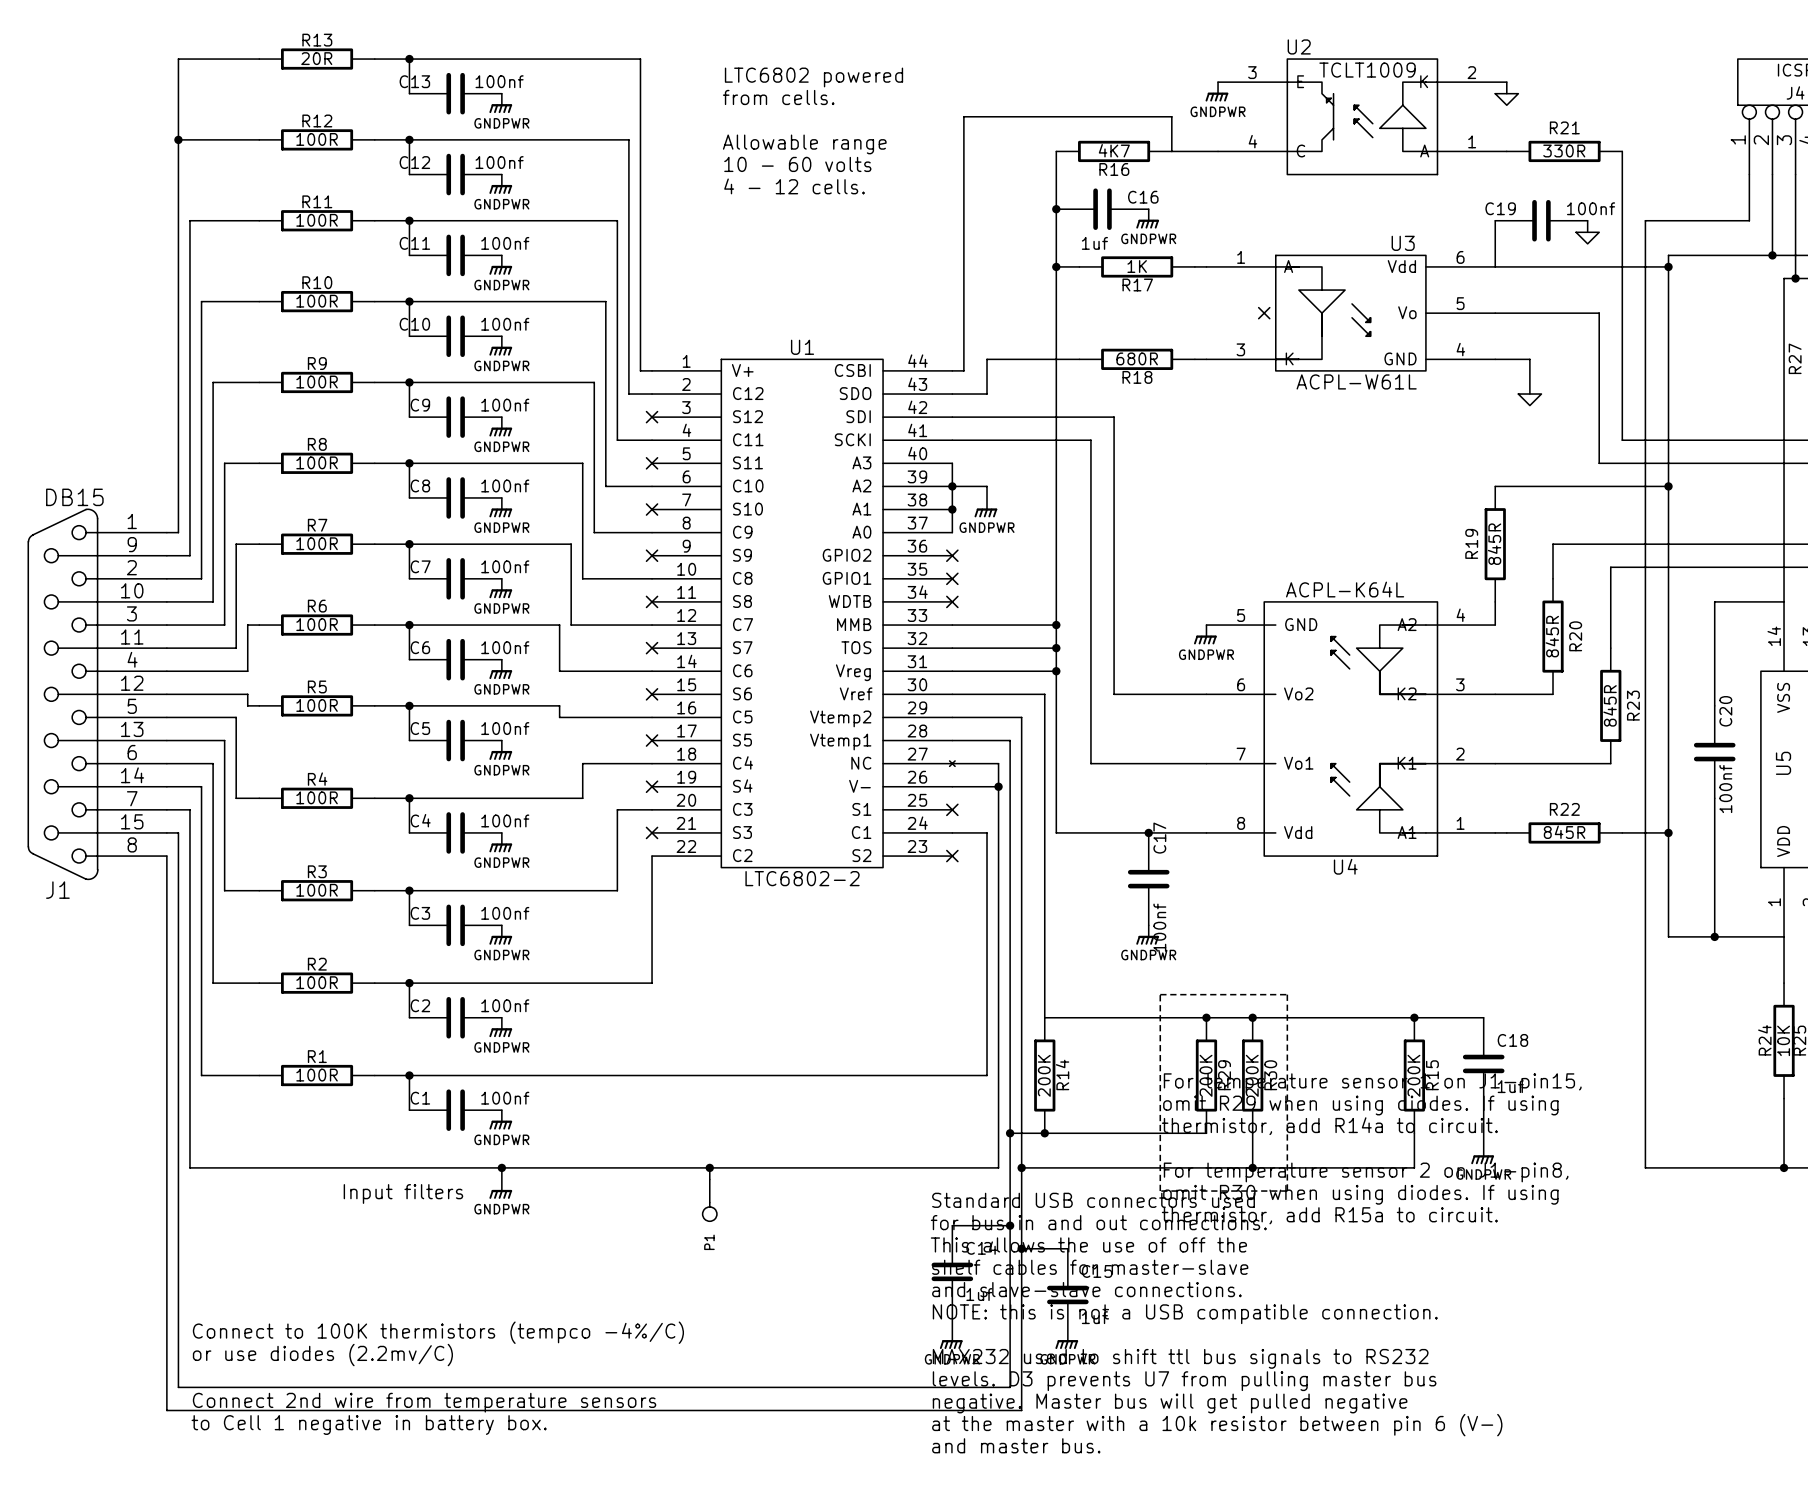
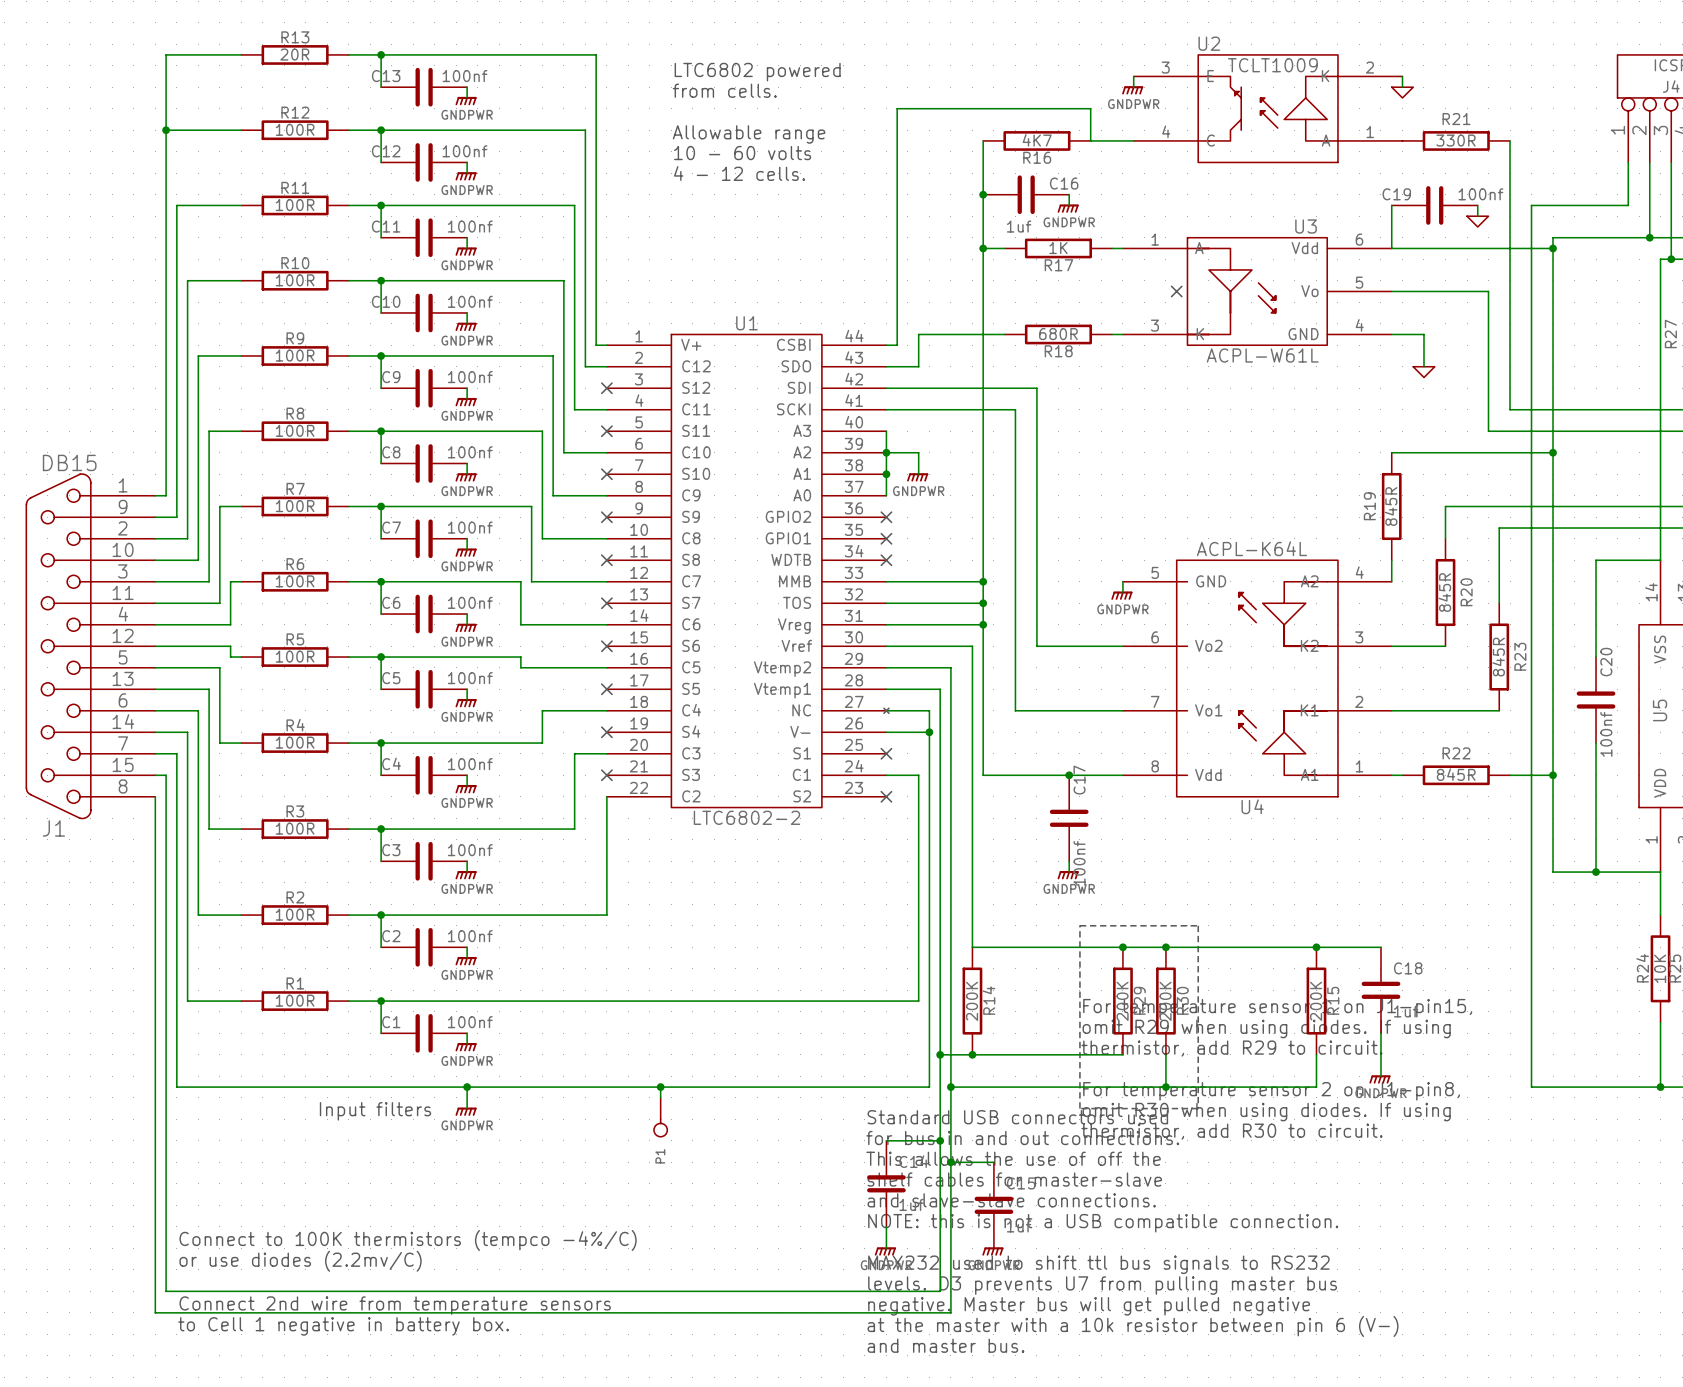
text: thermistor, add R14a to circuit. (1329, 1126) -> thermistor, add R29 to circuit. (1231, 1048)
text: thermistor, add R15a to circuit. (1329, 1215) -> thermistor, add R30 to circuit. (1231, 1131)

